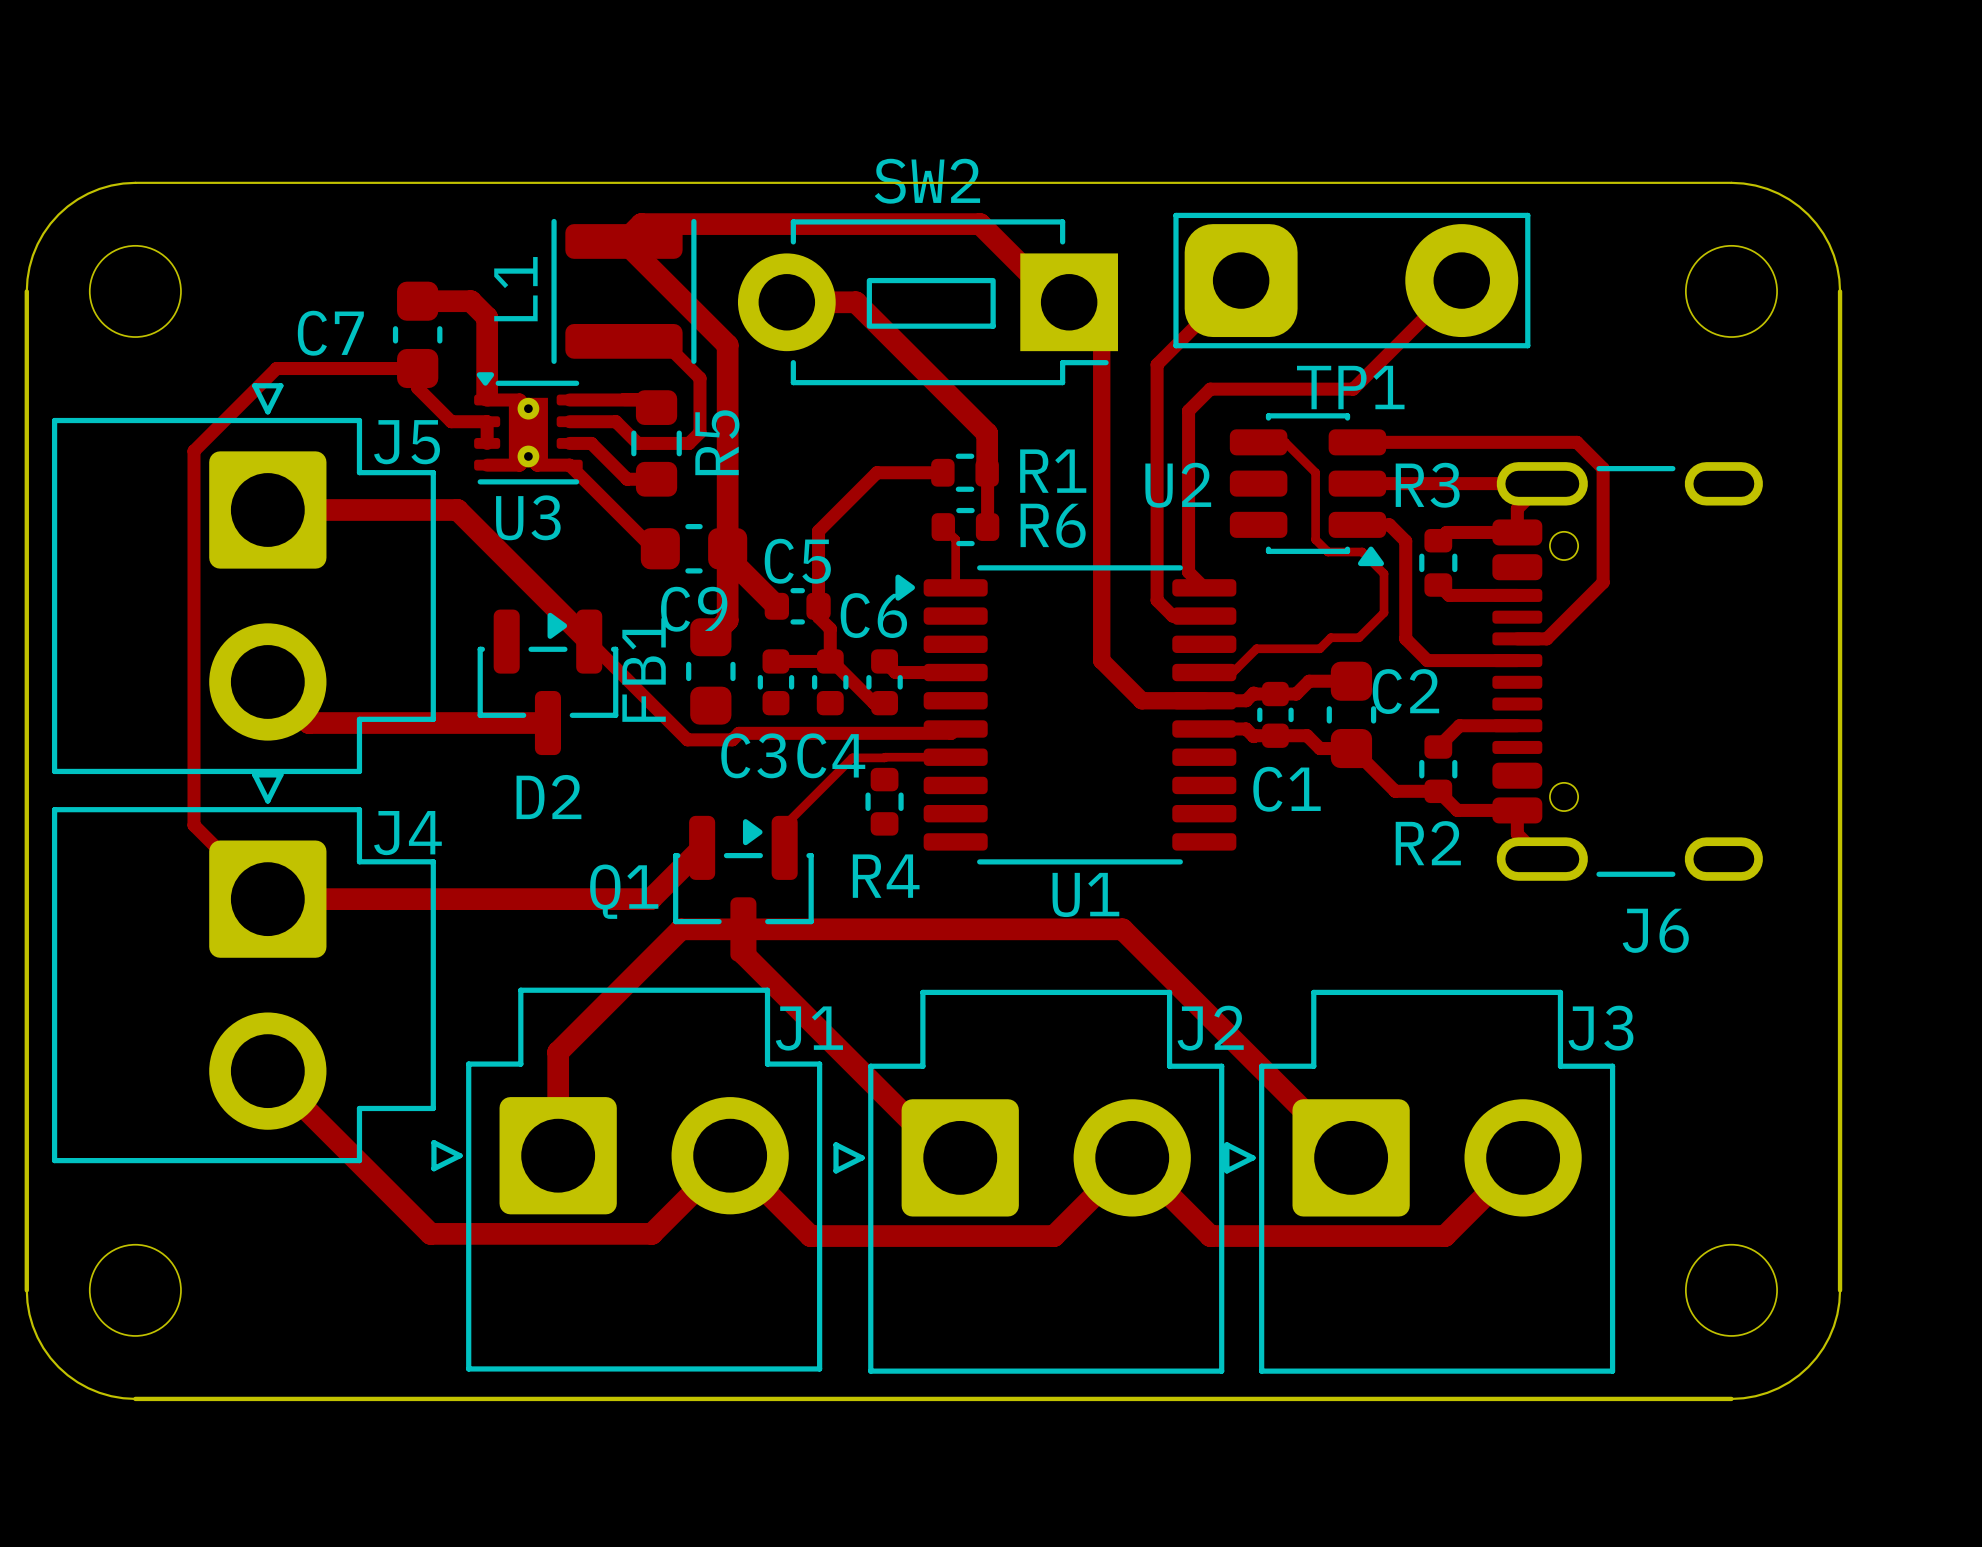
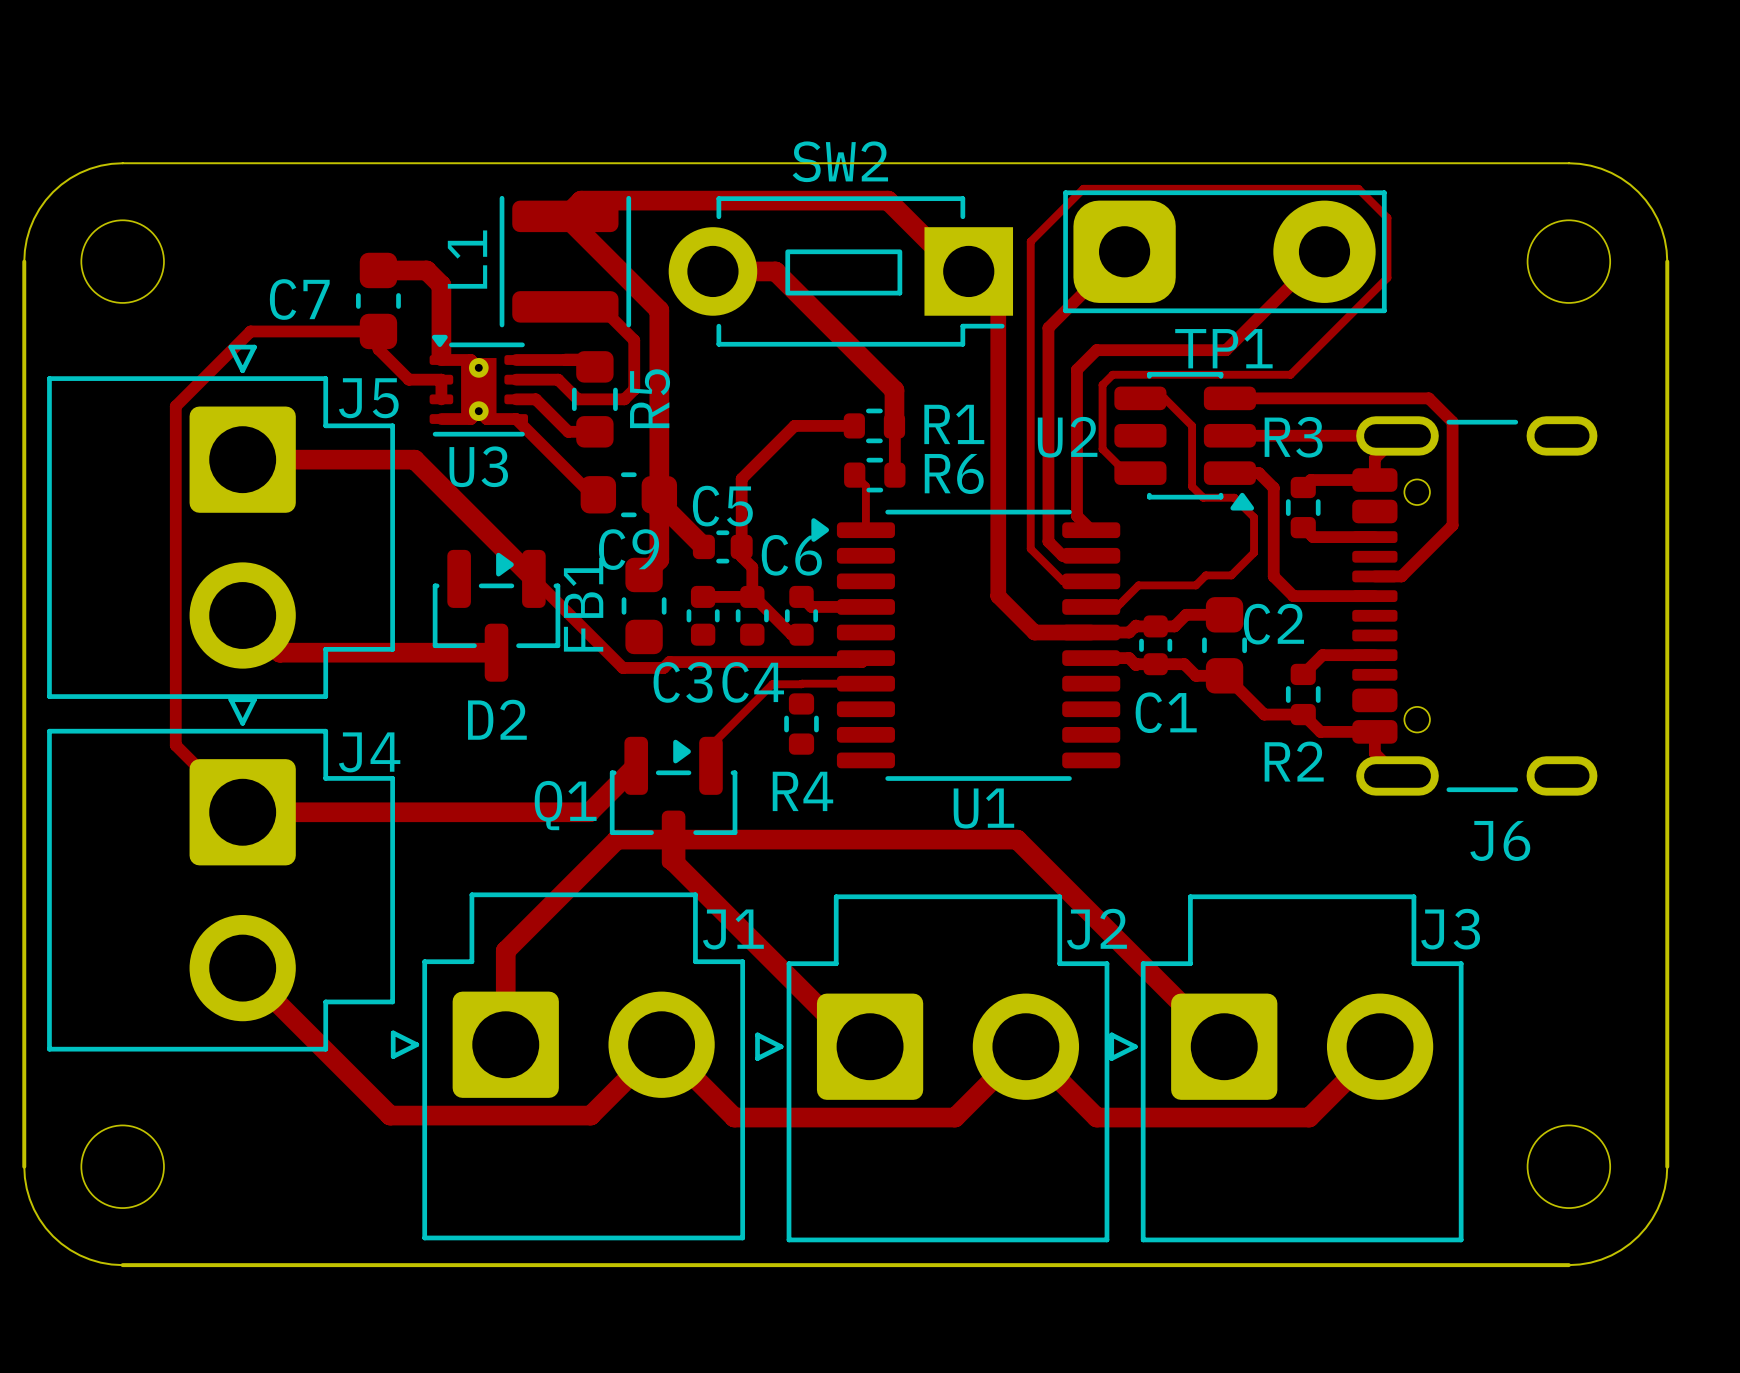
track: none -> (1140, 473) (1126, 473) (1102, 449) (1102, 384) (1112, 374) (1290, 374) (1387, 277) (1387, 217) (1358, 188) (1083, 188) (1030, 241) (1030, 548) (1063, 581) (1091, 581)

